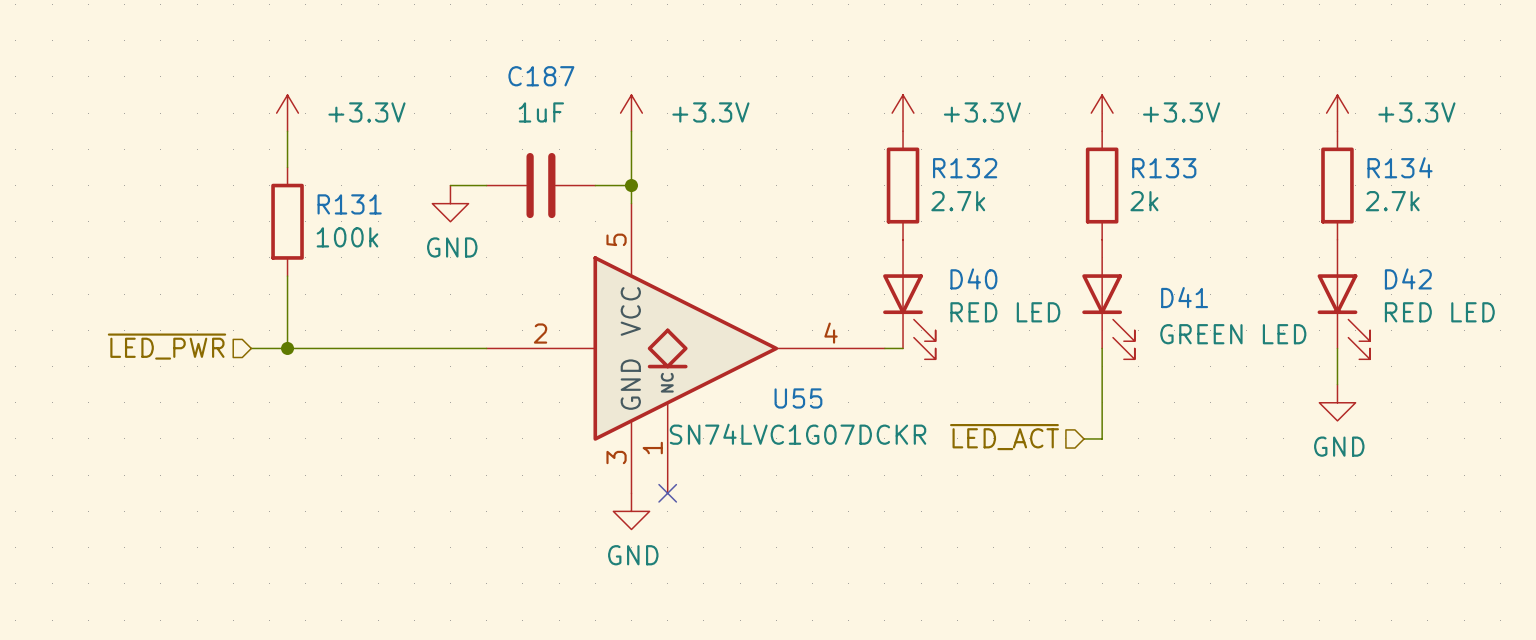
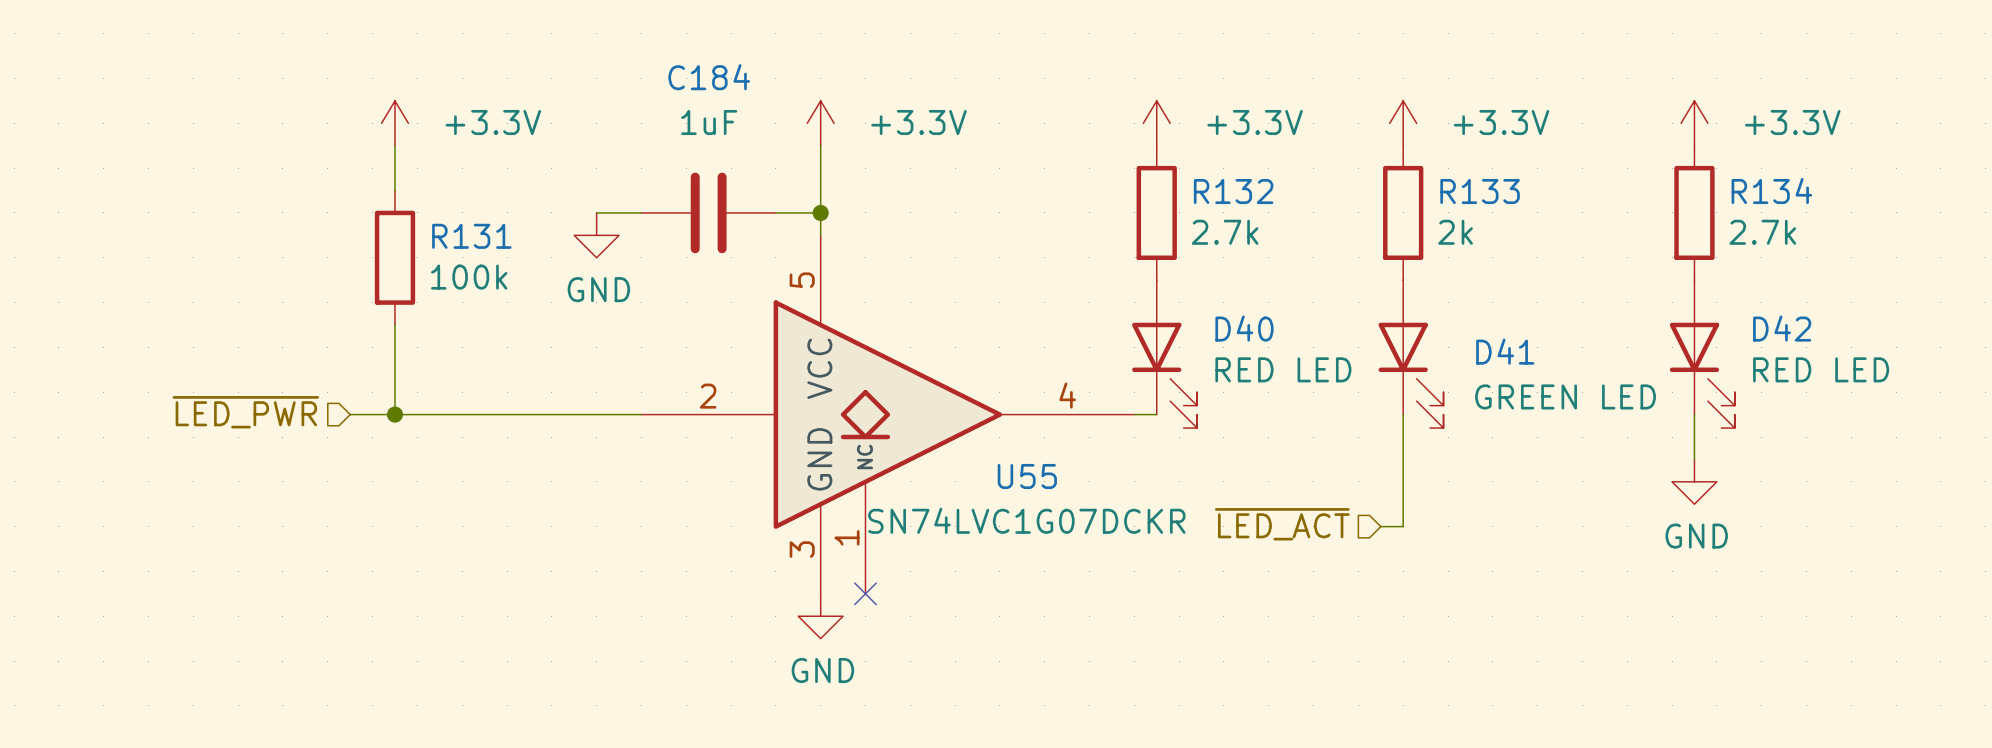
C187 name: C187 (541, 76) -> C184 (709, 77)

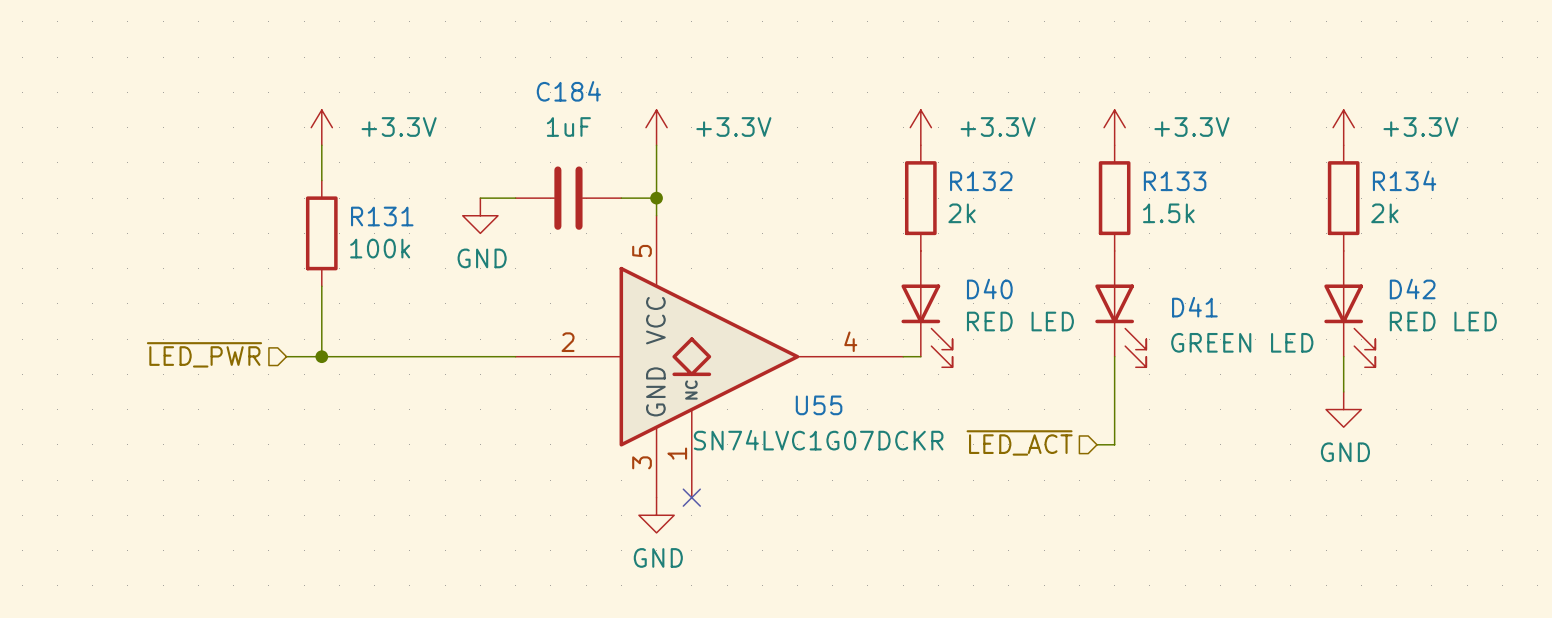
R132 value: 2.7k (1225, 232) -> 2k (961, 213)
R133 value: 2k (1455, 232) -> 1.5k (1168, 213)
R134 value: 2.7k (1762, 232) -> 2k (1384, 213)

